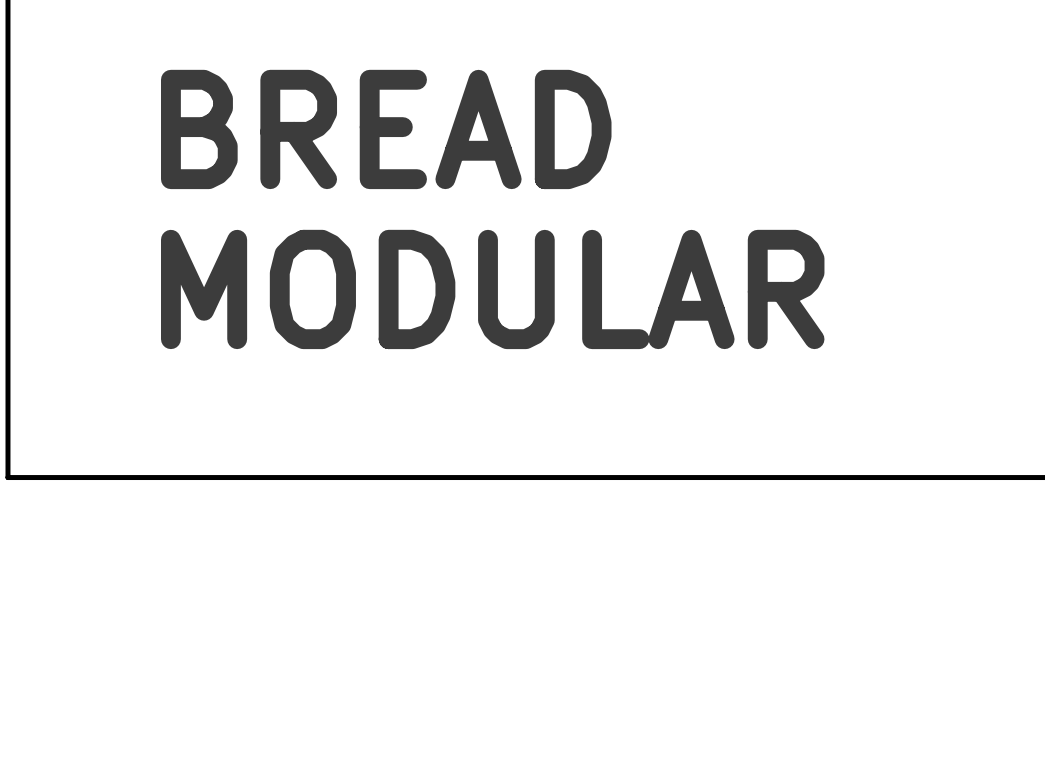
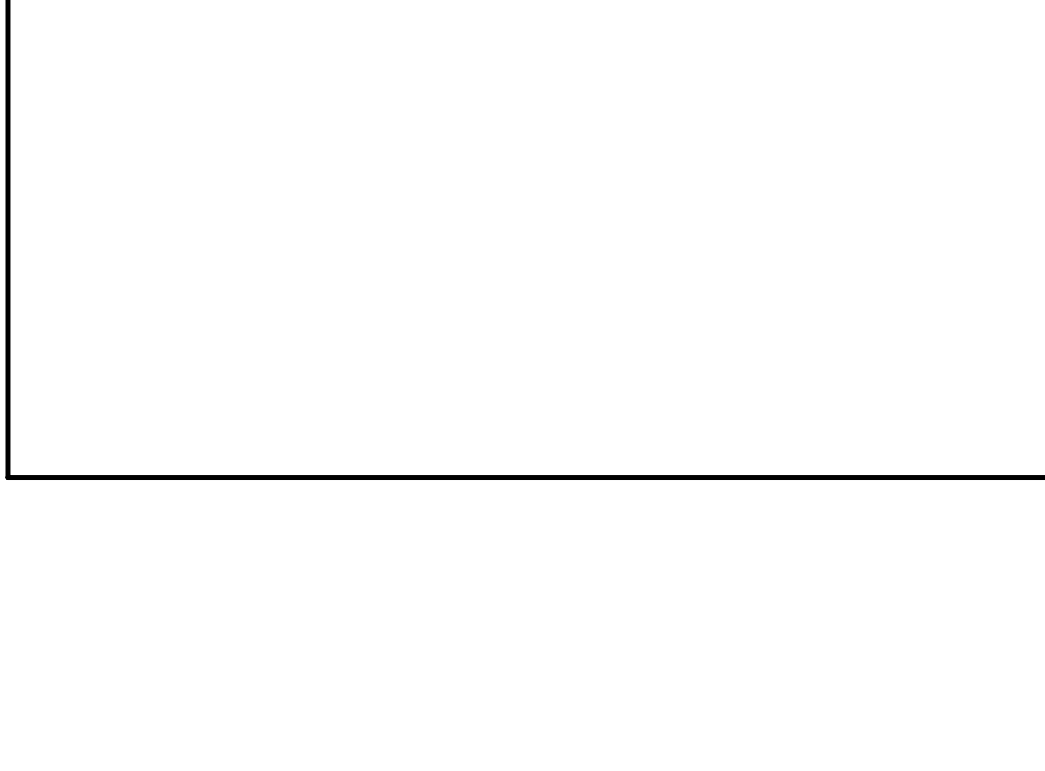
text: BREAD (386, 129) -> none
text: MODULAR (492, 289) -> none

